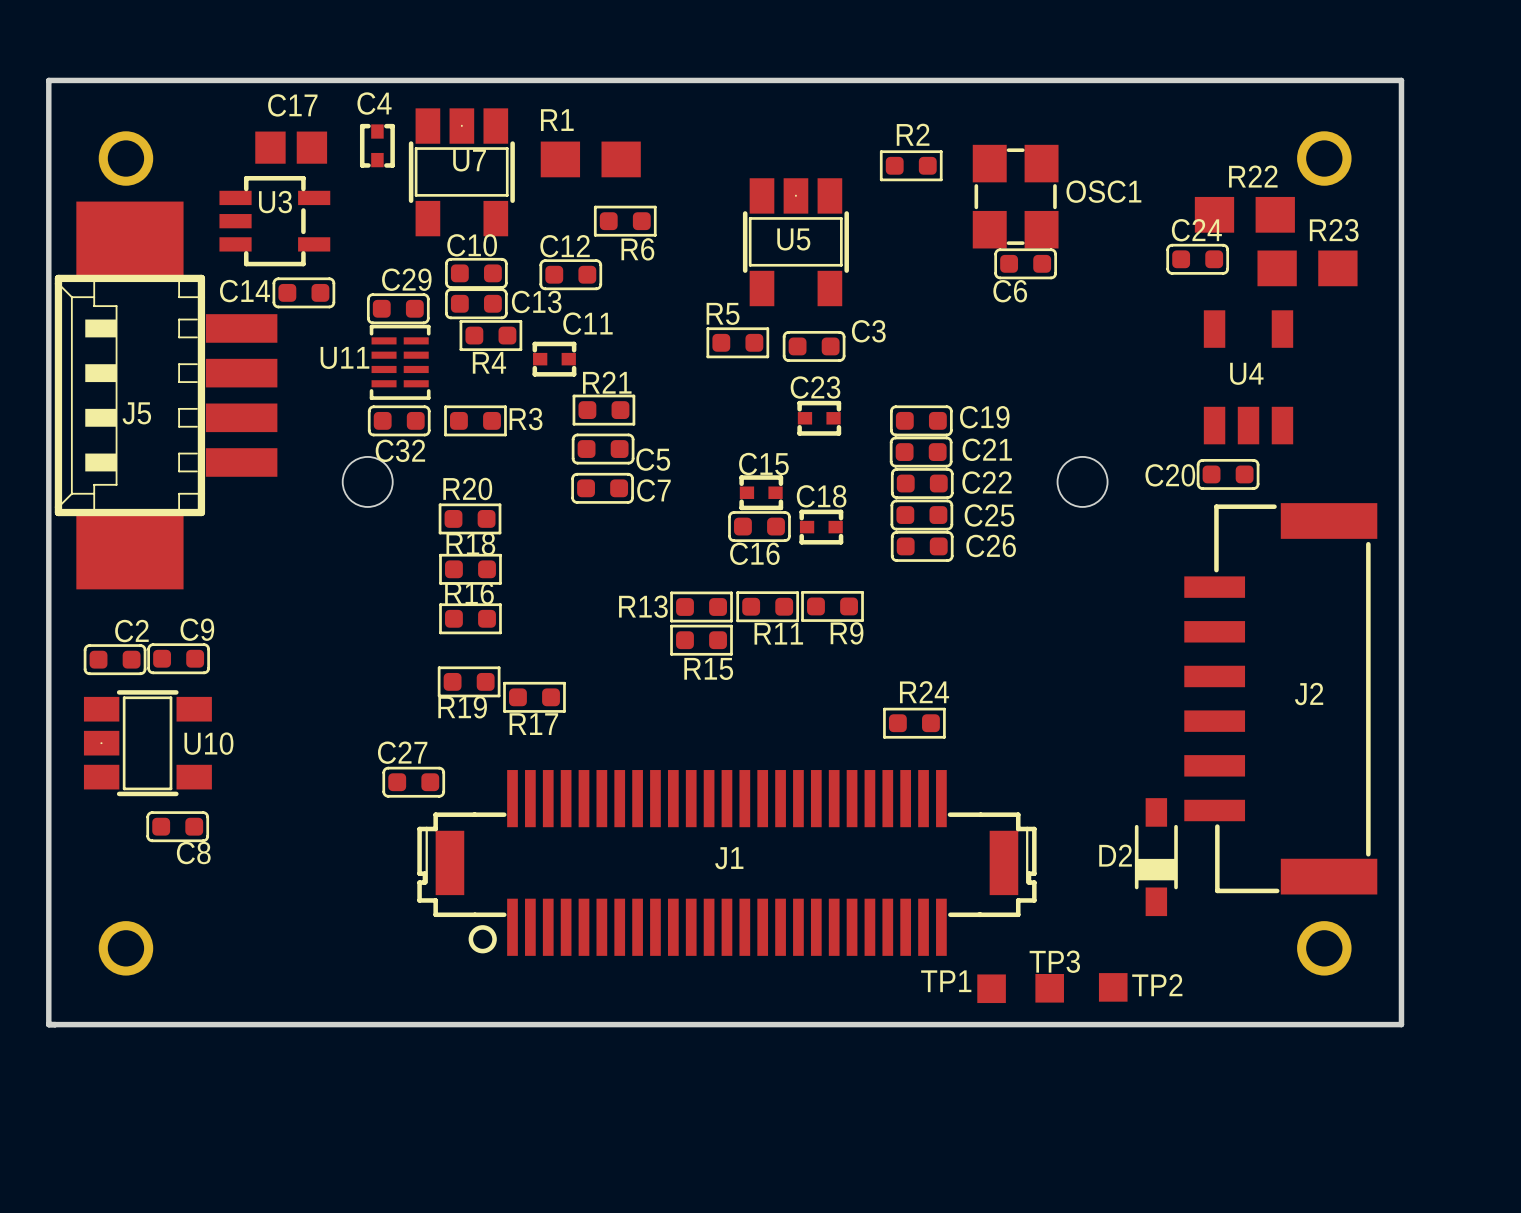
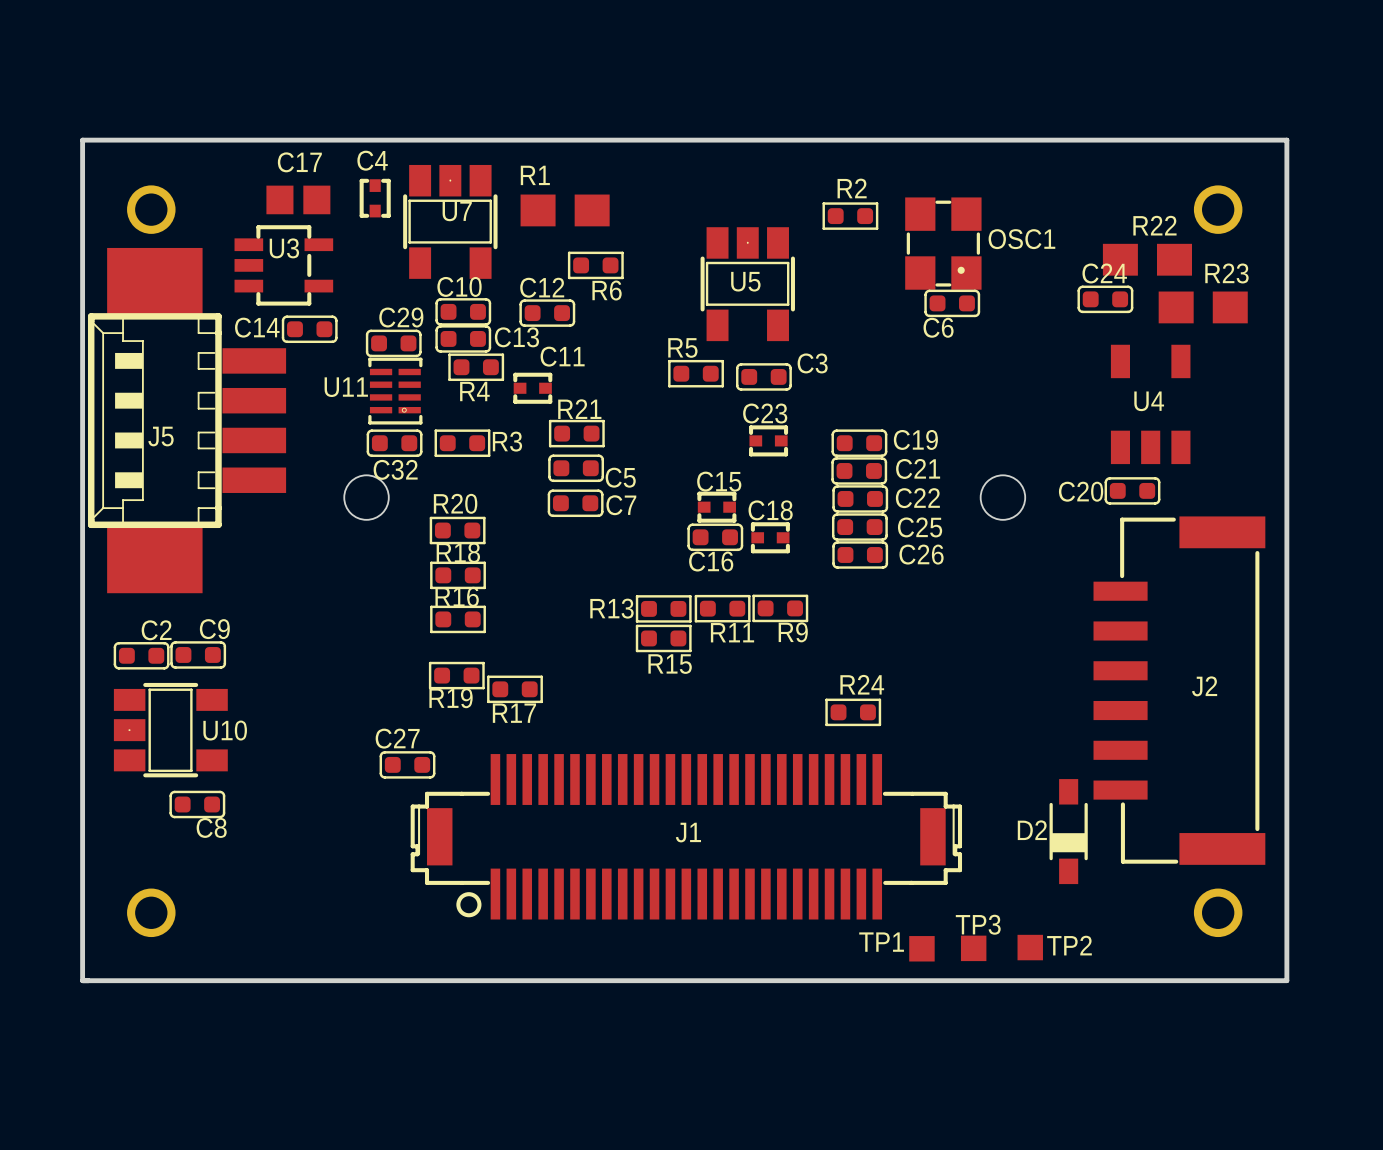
OSC1 footprint: [972, 144, 1059, 249] -> [905, 197, 982, 290]
U11 footprint: [369, 324, 431, 400] -> [368, 357, 423, 425]

